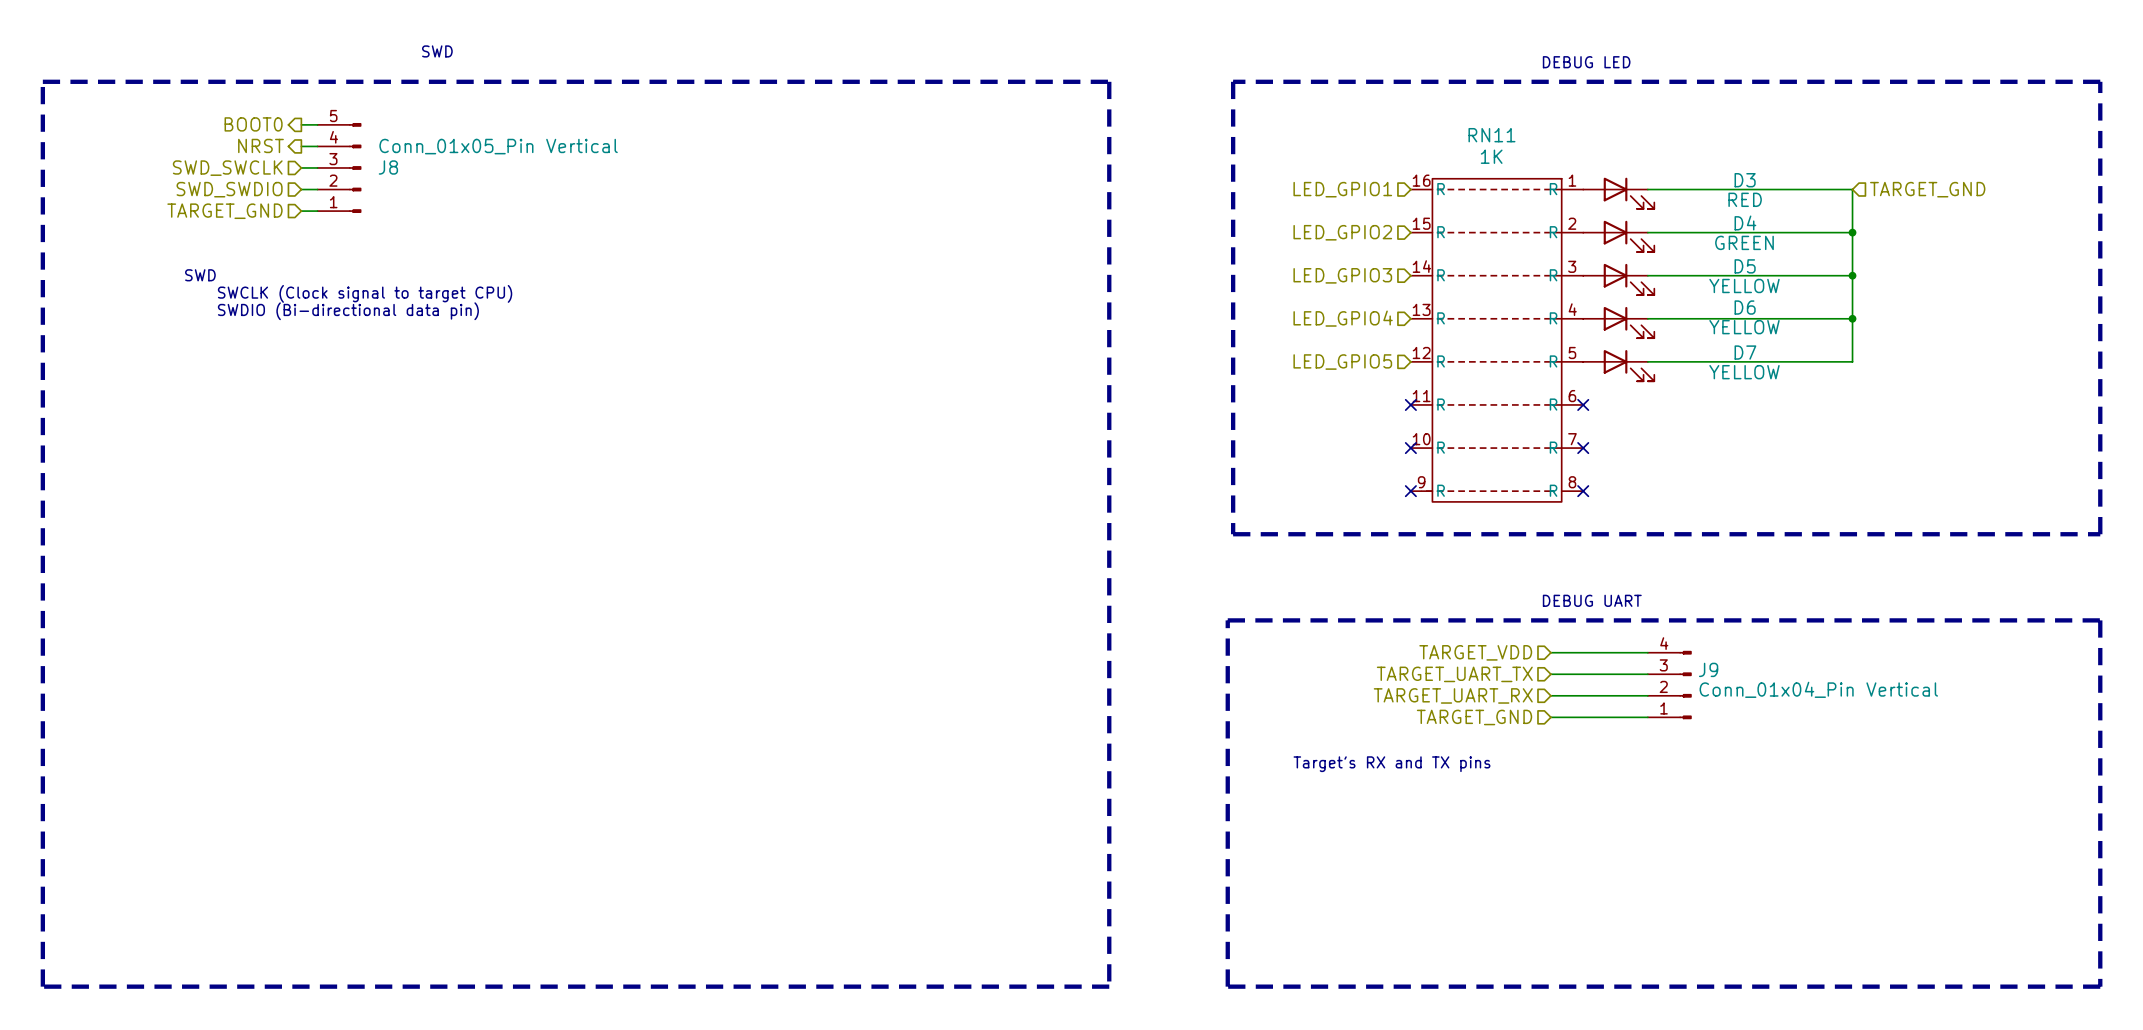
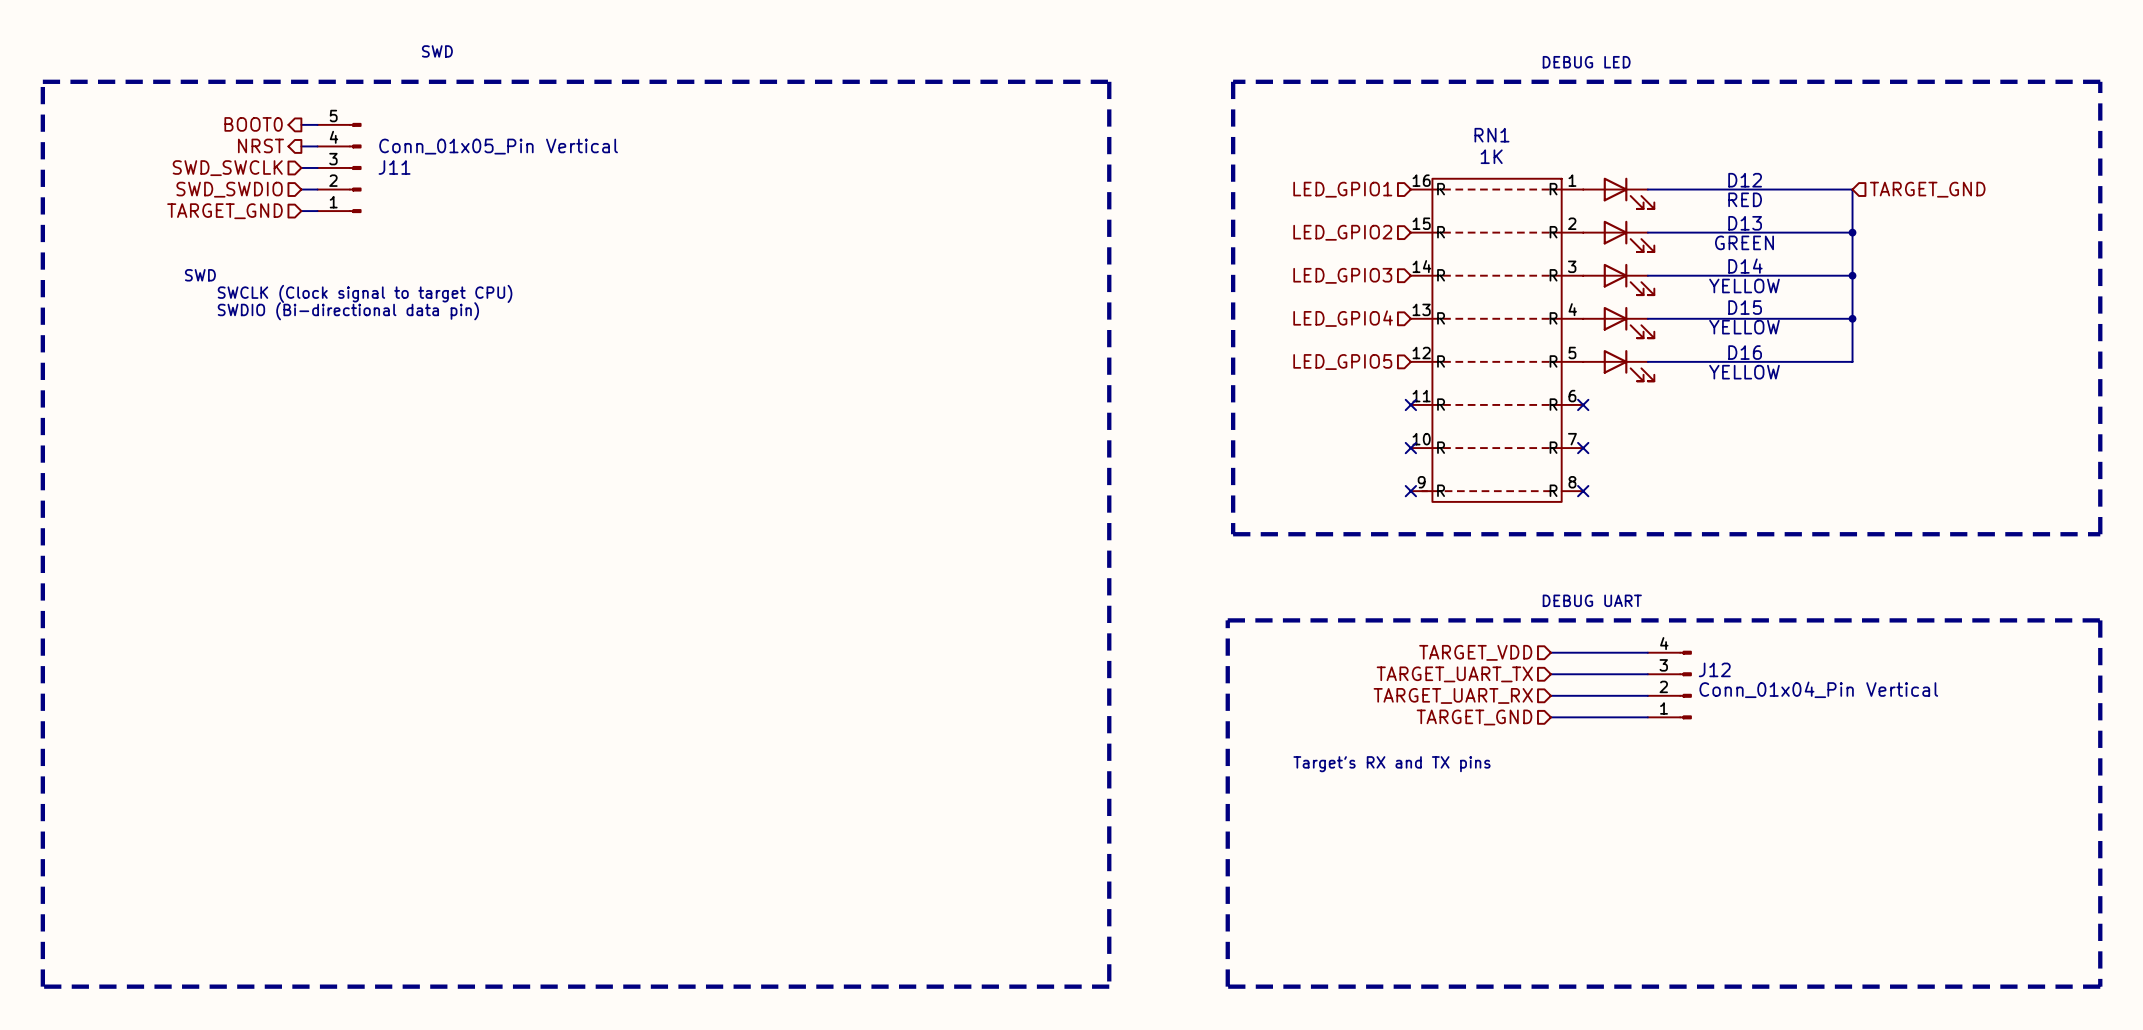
RN11 name: RN11 (1491, 135) -> RN1 (1491, 135)
J8 name: J8 (388, 167) -> J11 (394, 167)
D3 name: D3 (1745, 180) -> D12 (1745, 180)
D4 name: D4 (1745, 222) -> D13 (1745, 223)
D5 name: D5 (1745, 266) -> D14 (1745, 266)
D6 name: D6 (1745, 307) -> D15 (1745, 307)
D7 name: D7 (1745, 352) -> D16 (1745, 352)
J9 name: J9 (1708, 669) -> J12 (1714, 669)

